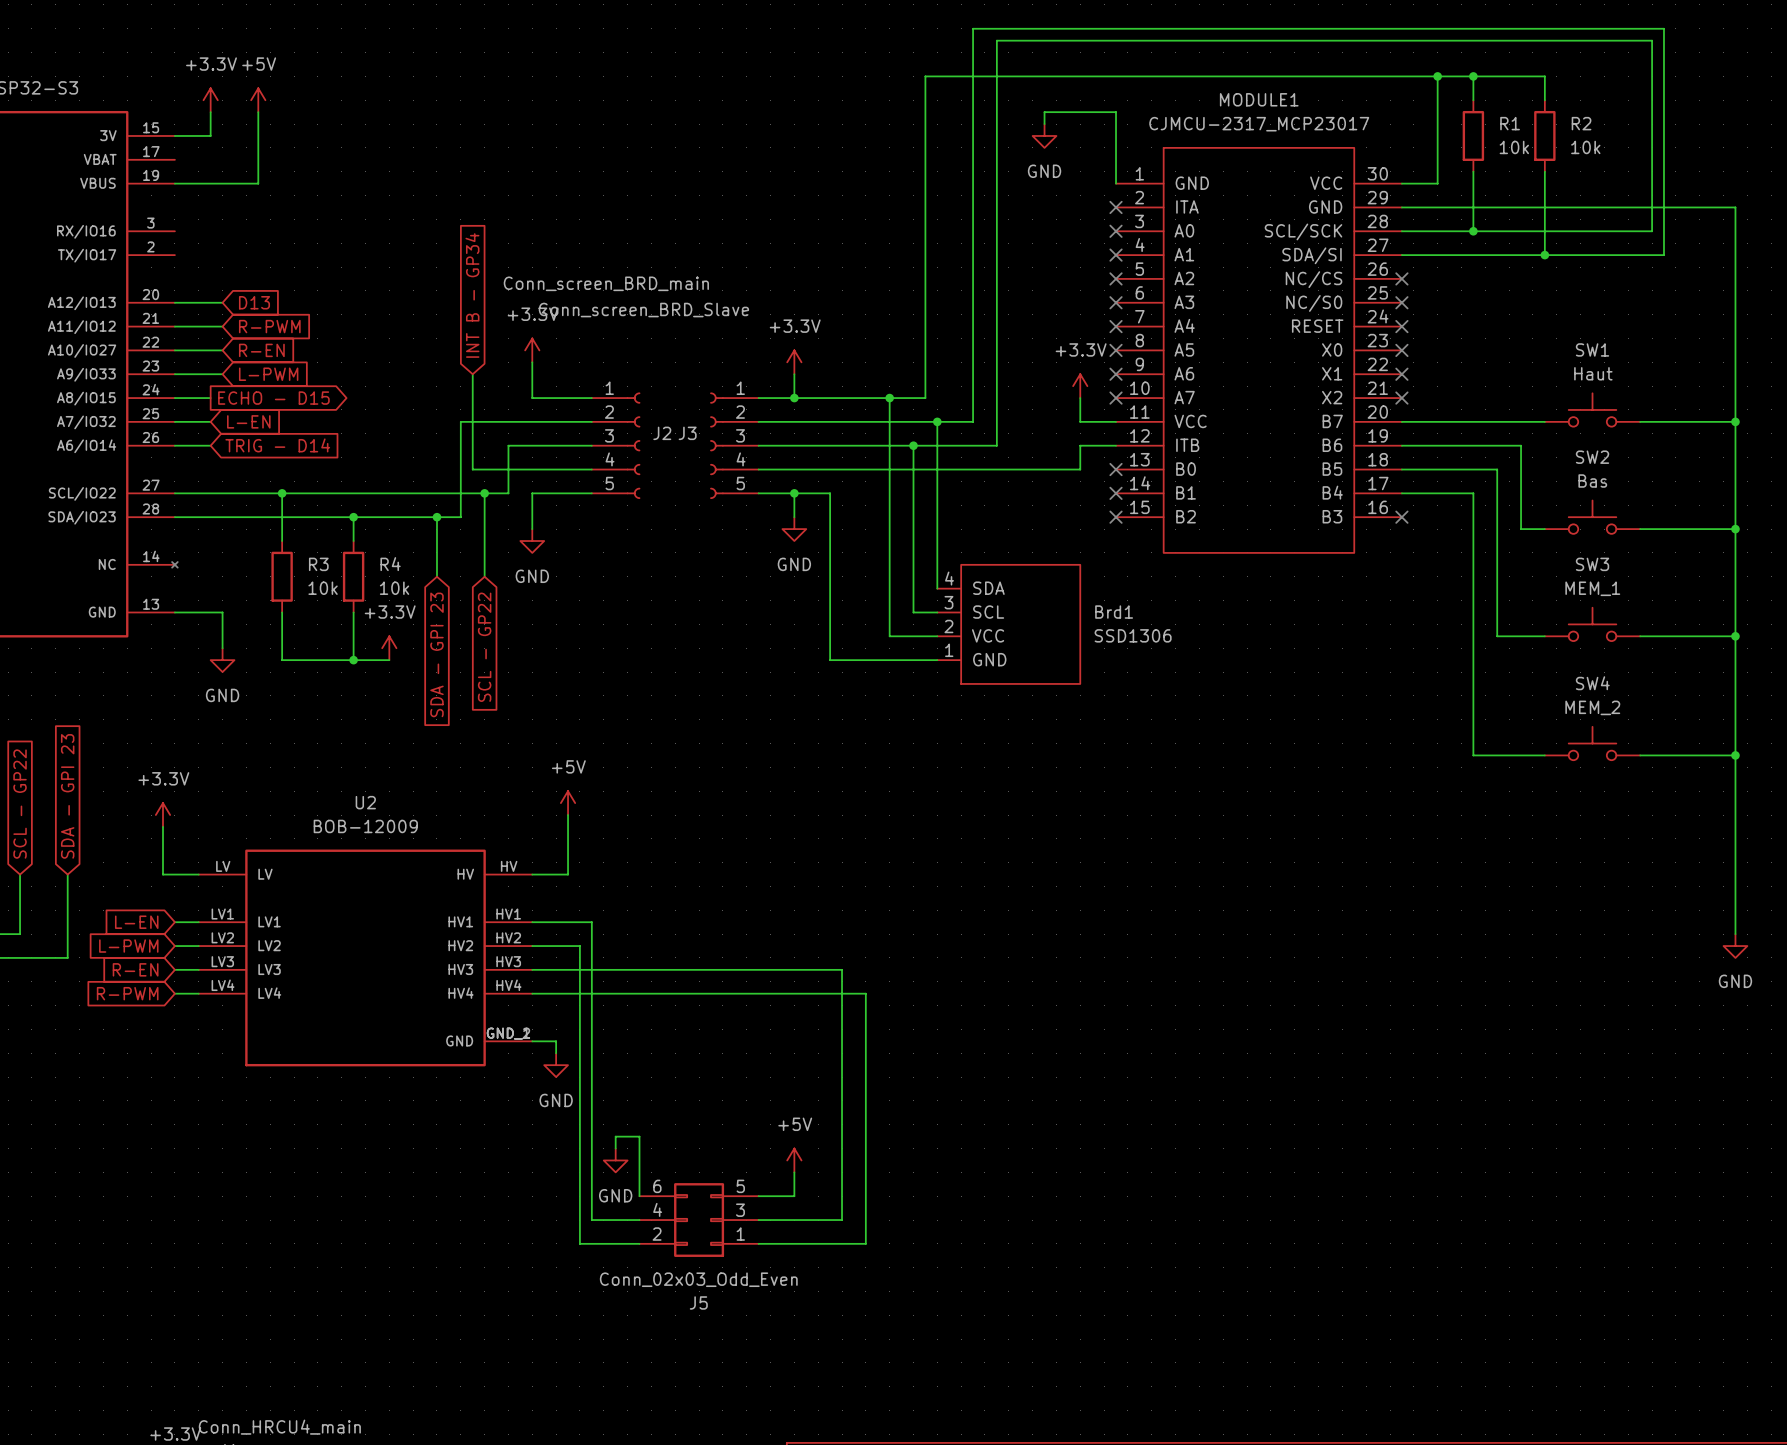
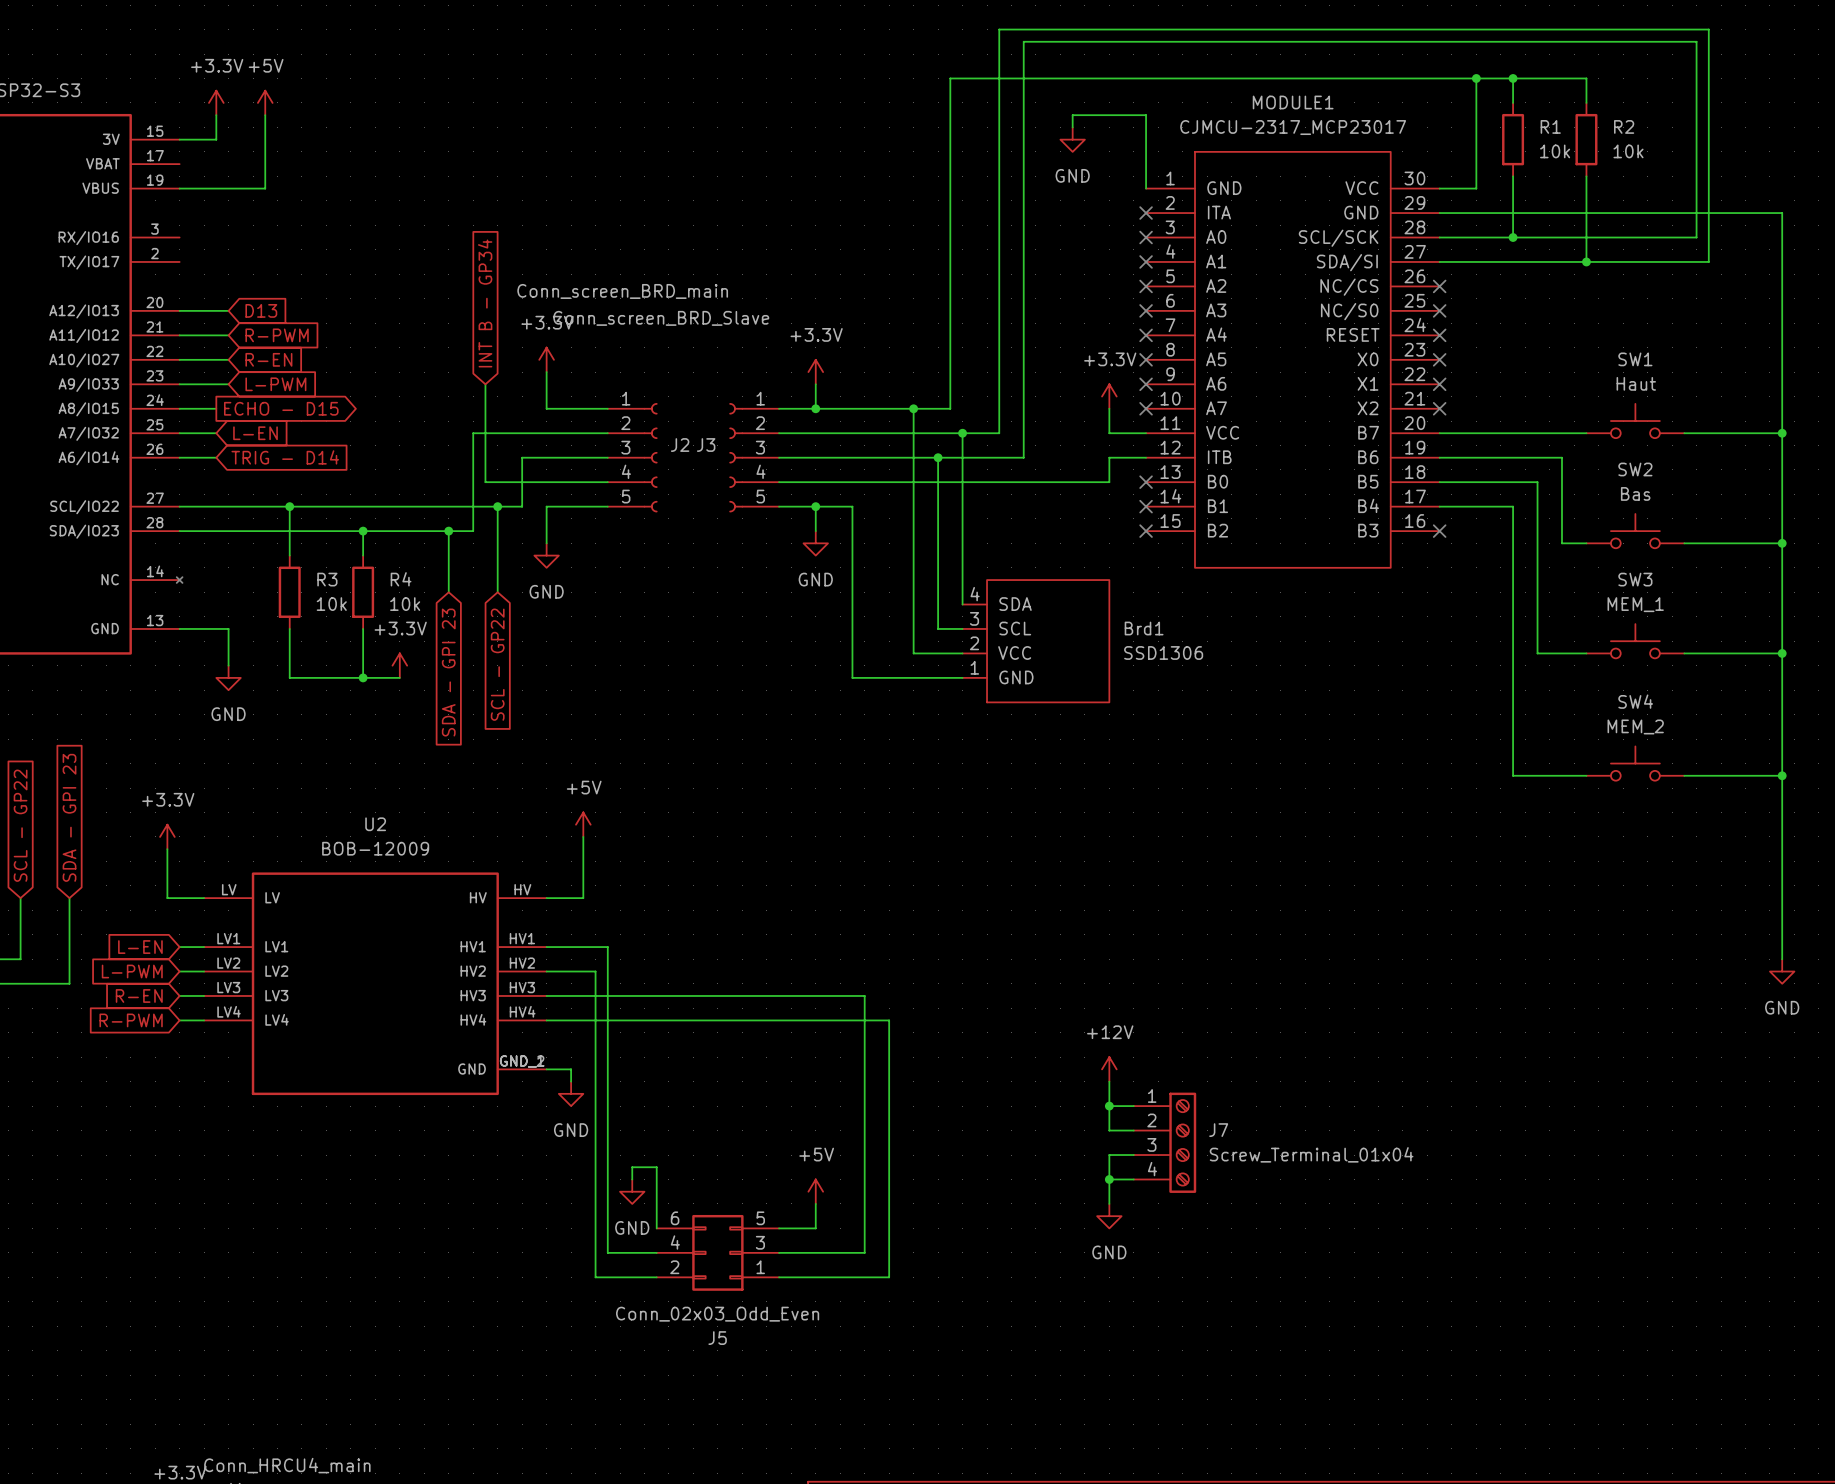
power symbol: none -> +12V (1109, 1069)
wire: none -> (1109, 1081) (1109, 1130) (1133, 1130)
wire: none -> (1109, 1106) (1133, 1106)
junction: none -> (1109, 1106)
J7: none -> Screw_Terminal_01x04 (1165, 1142)
wire: none -> (1133, 1155) (1109, 1155) (1109, 1203)
wire: none -> (1109, 1179) (1133, 1179)
junction: none -> (1109, 1179)
power symbol: none -> GND (1109, 1216)

